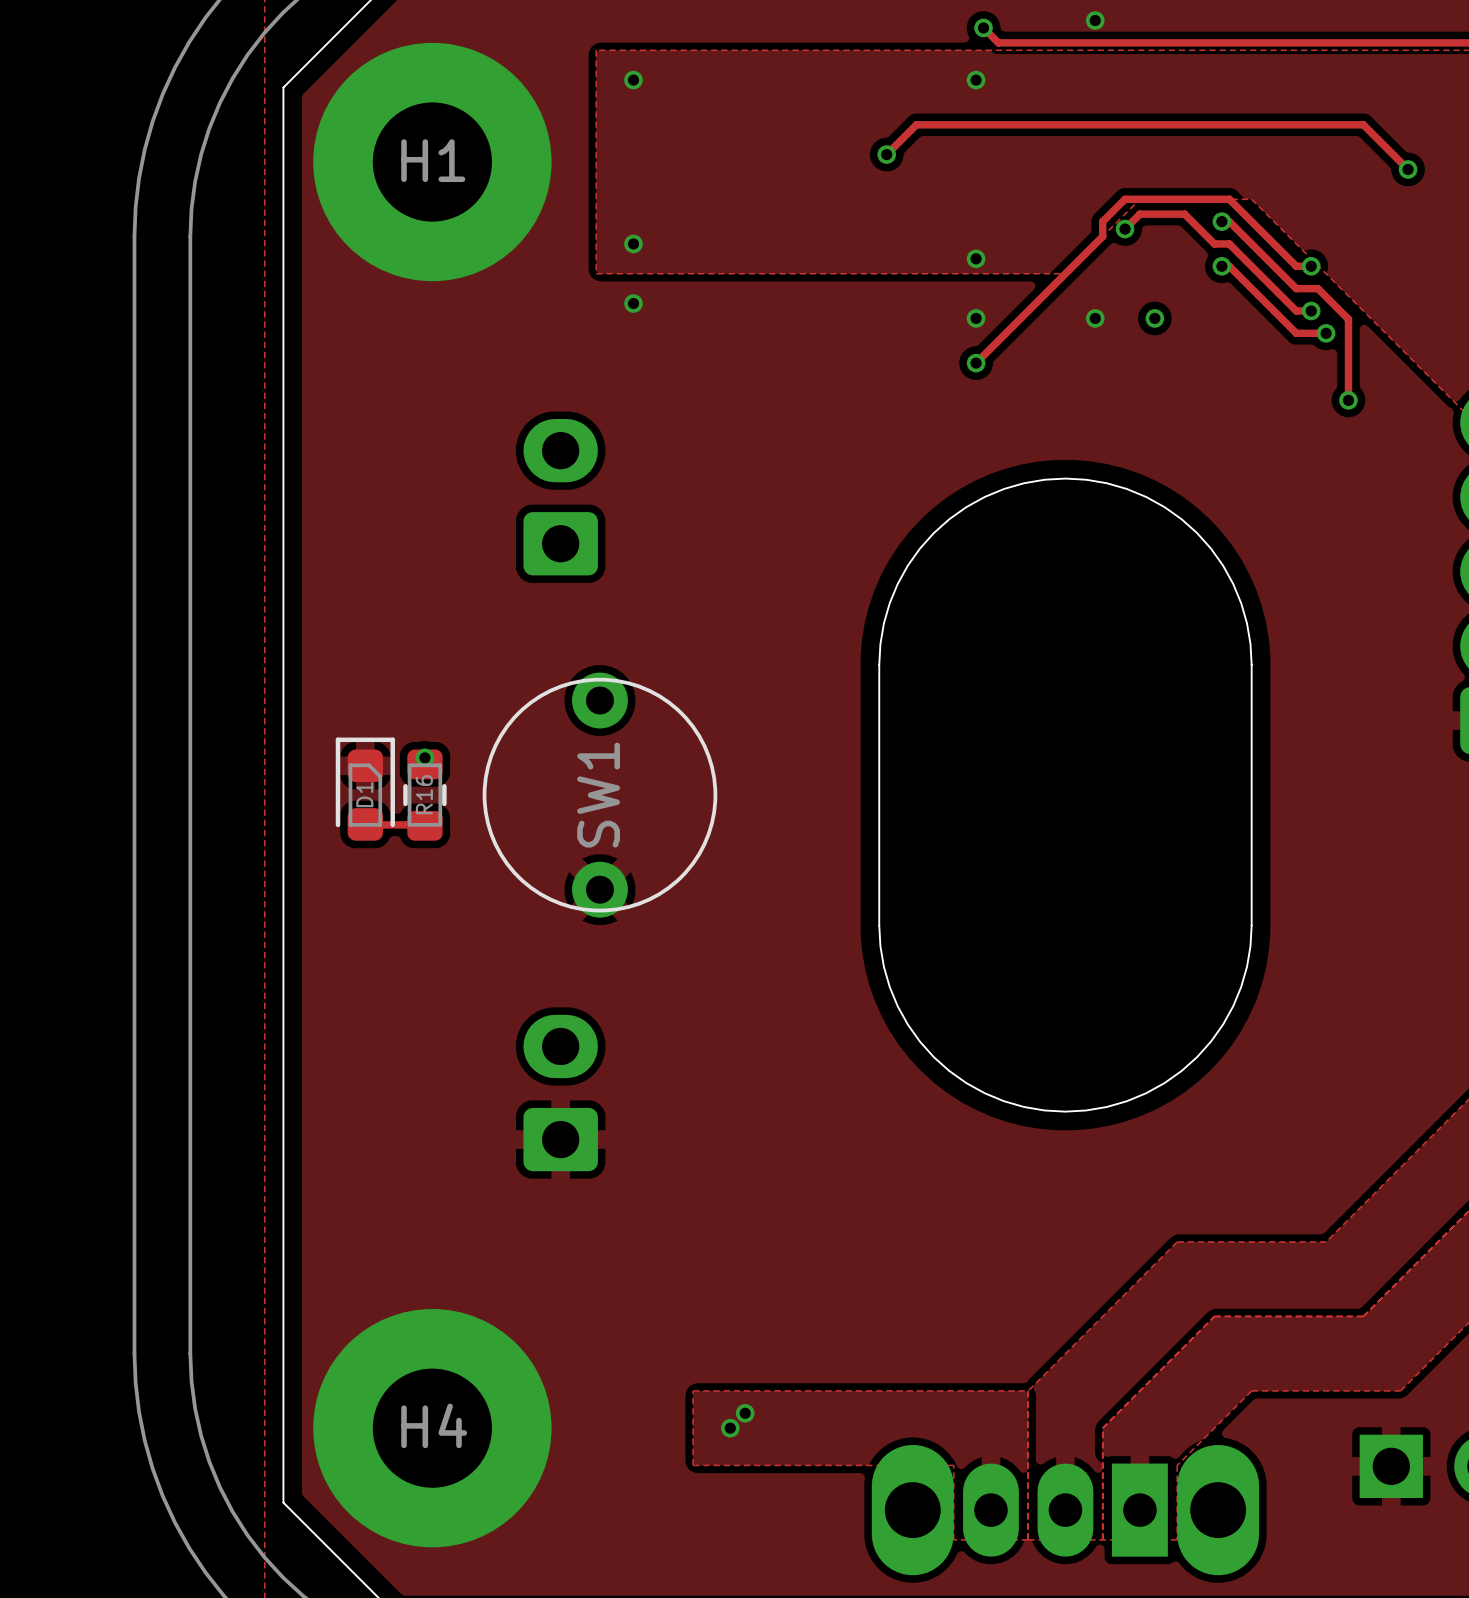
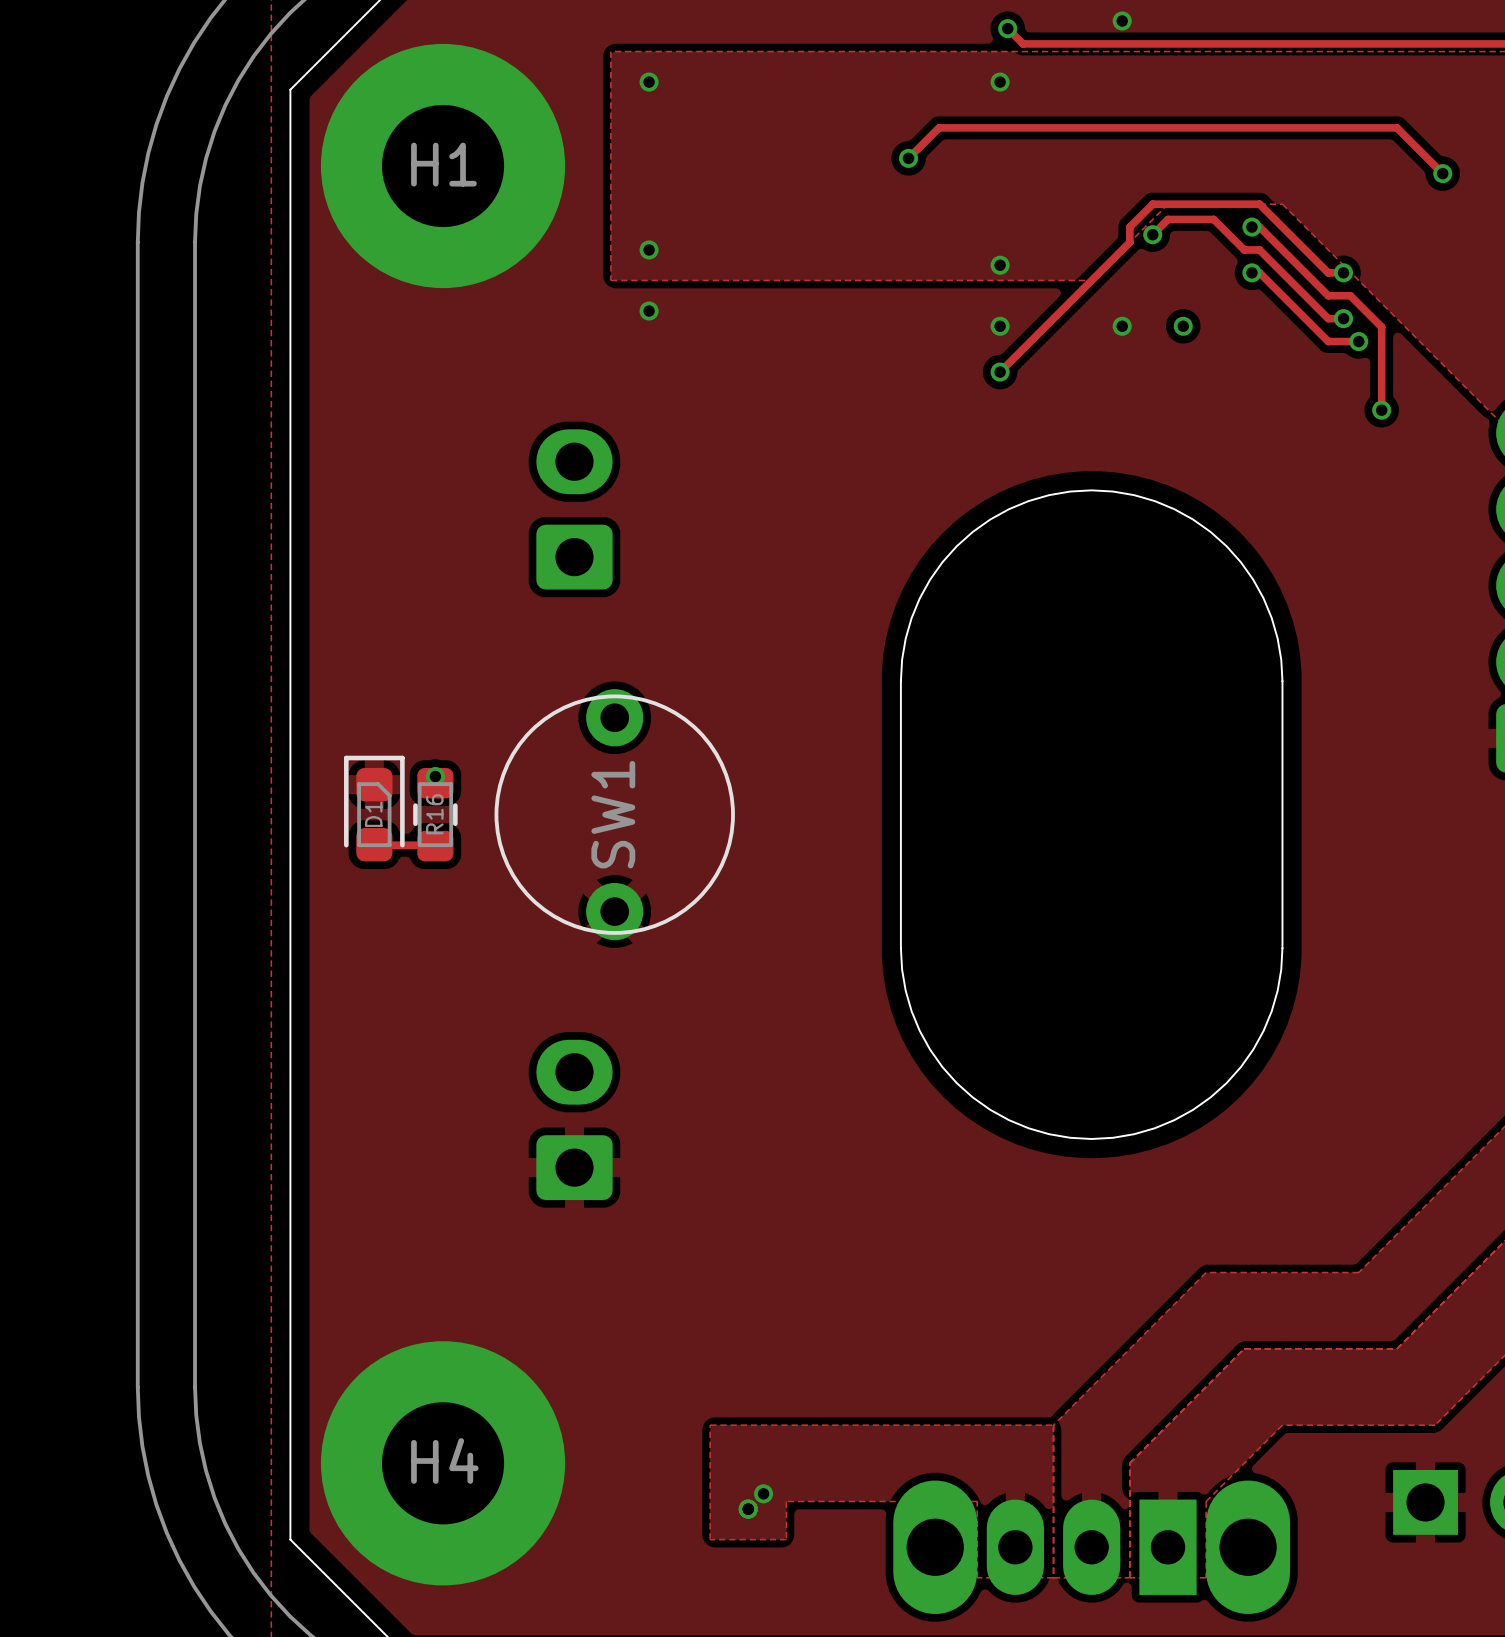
via: (745, 1413) -> none
via: (730, 1428) -> none
via: none -> (763, 1493)
zone outline: (693, 1465) (767, 1465) -> (710, 1501) (710, 1539) (786, 1539) (786, 1501)
via: none -> (748, 1509)

